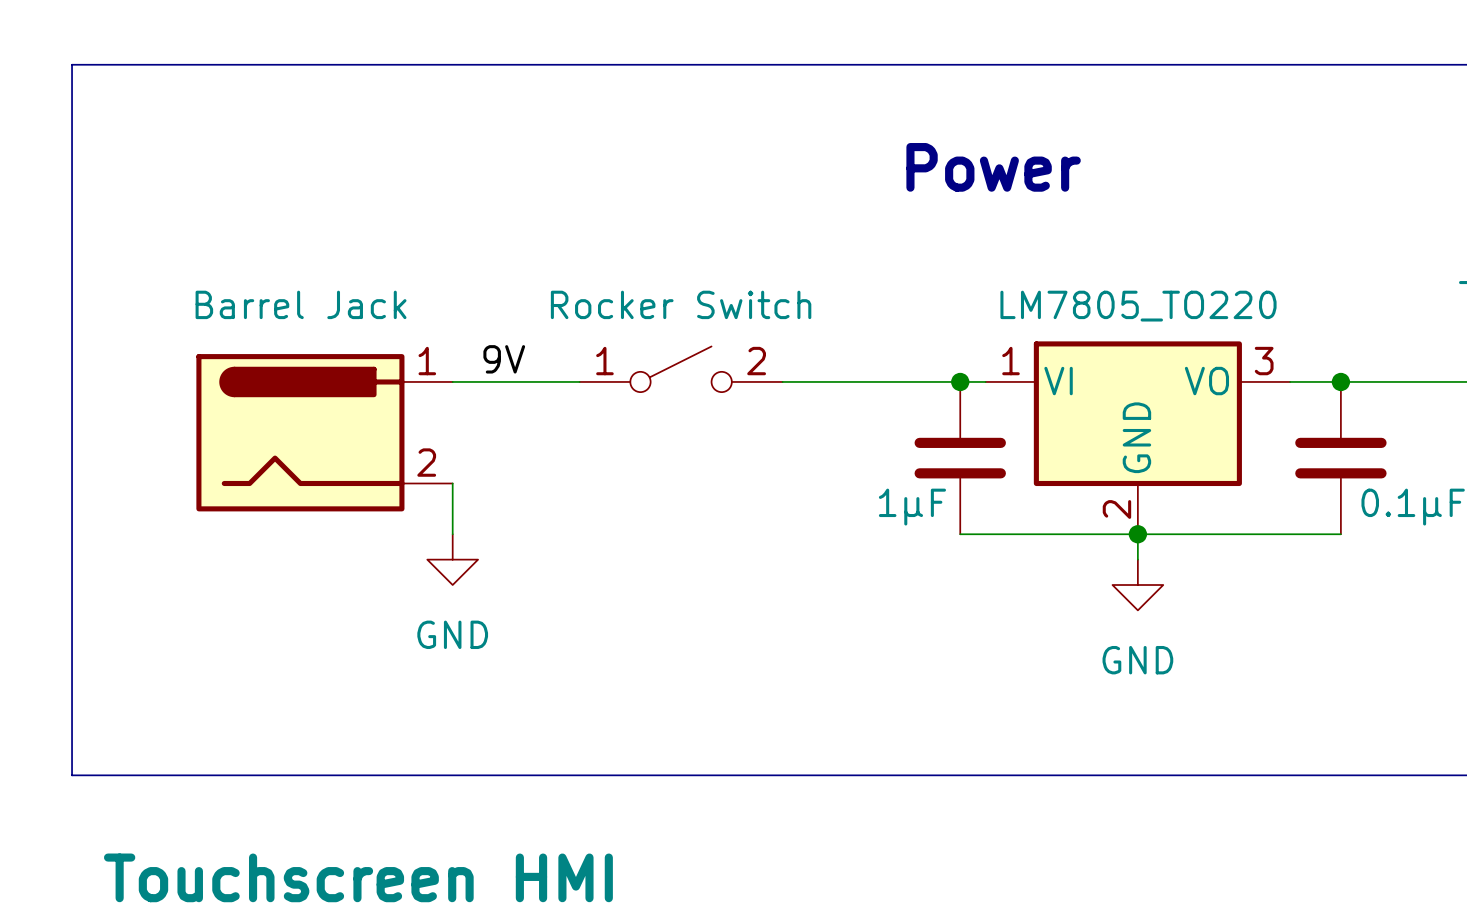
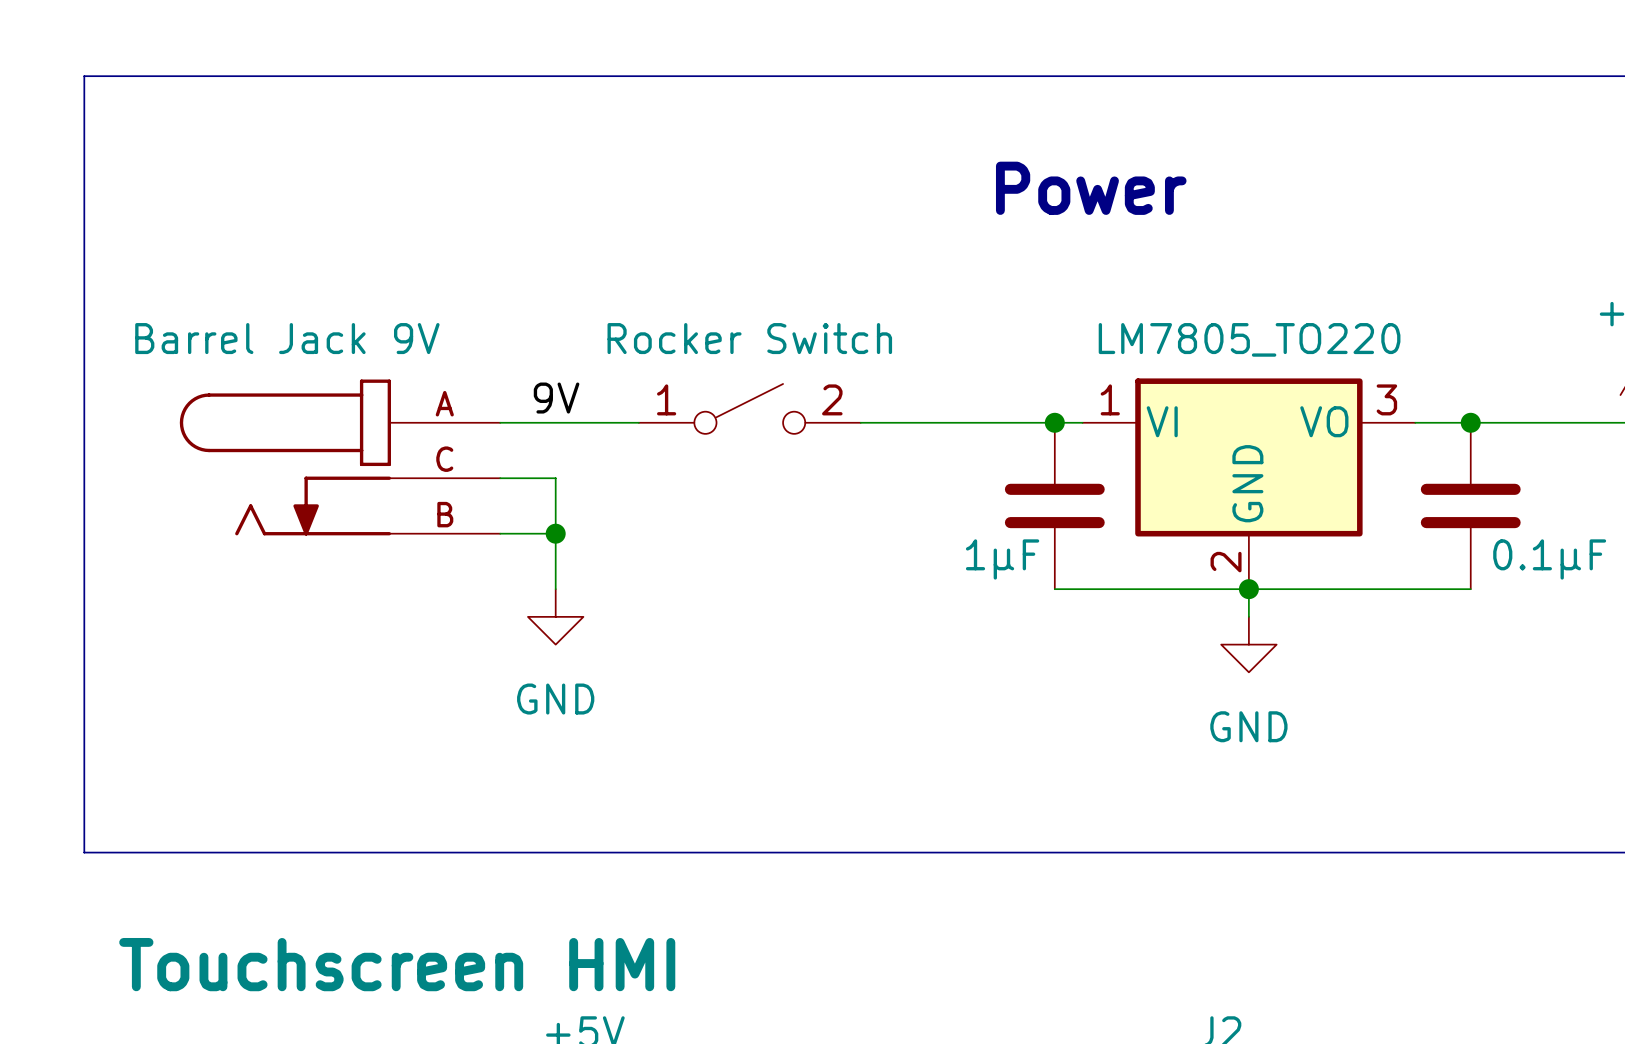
part: none -> Barrel Jack 9V (340, 457)
part: Barrel Jack (324, 432) -> none
wire: none -> (500, 478) (555, 478) (555, 589)
wire: (452, 483) (452, 534) -> (500, 533) (555, 533)
junction: none -> (555, 533)
power symbol position: GND (452, 559) -> GND (555, 616)

